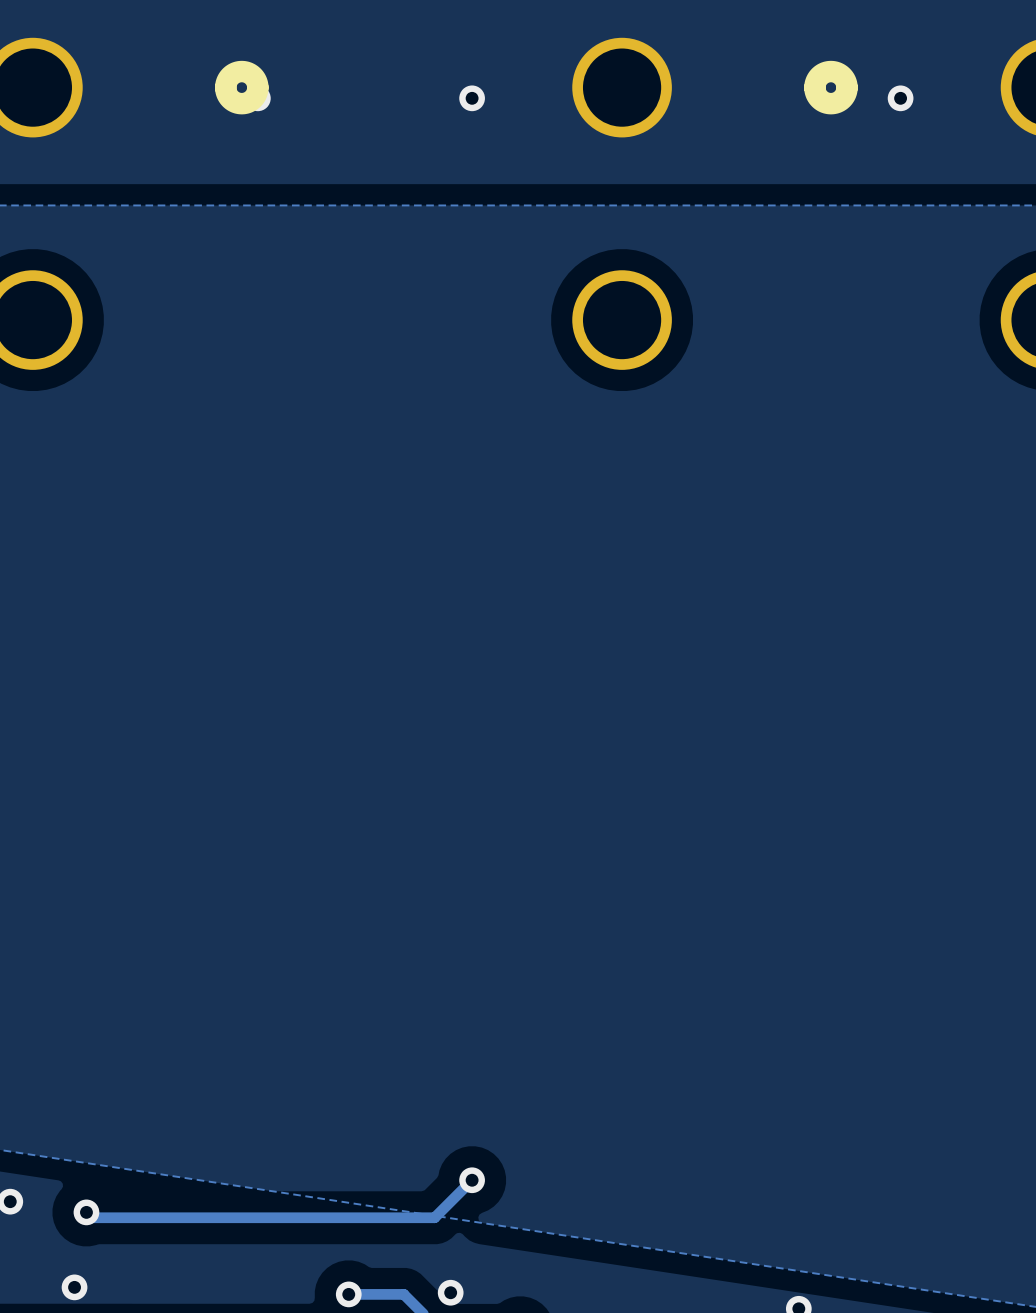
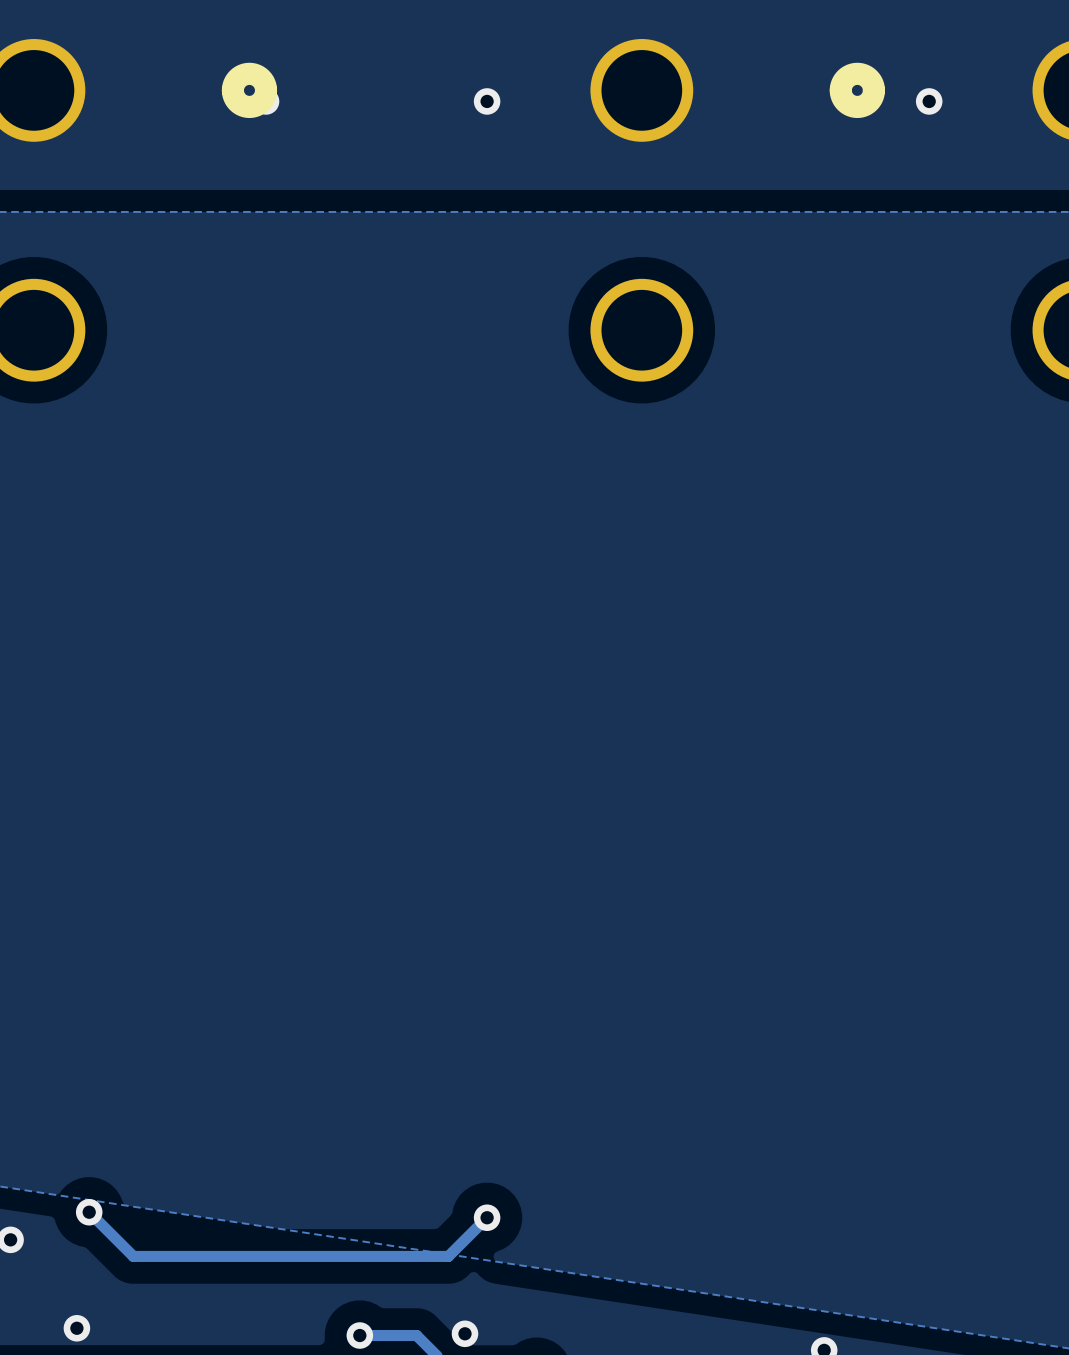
track: (86, 1212) (91, 1217) (129, 1217) -> (89, 1212) (133, 1256)
via position: (86, 1212) -> (89, 1212)

